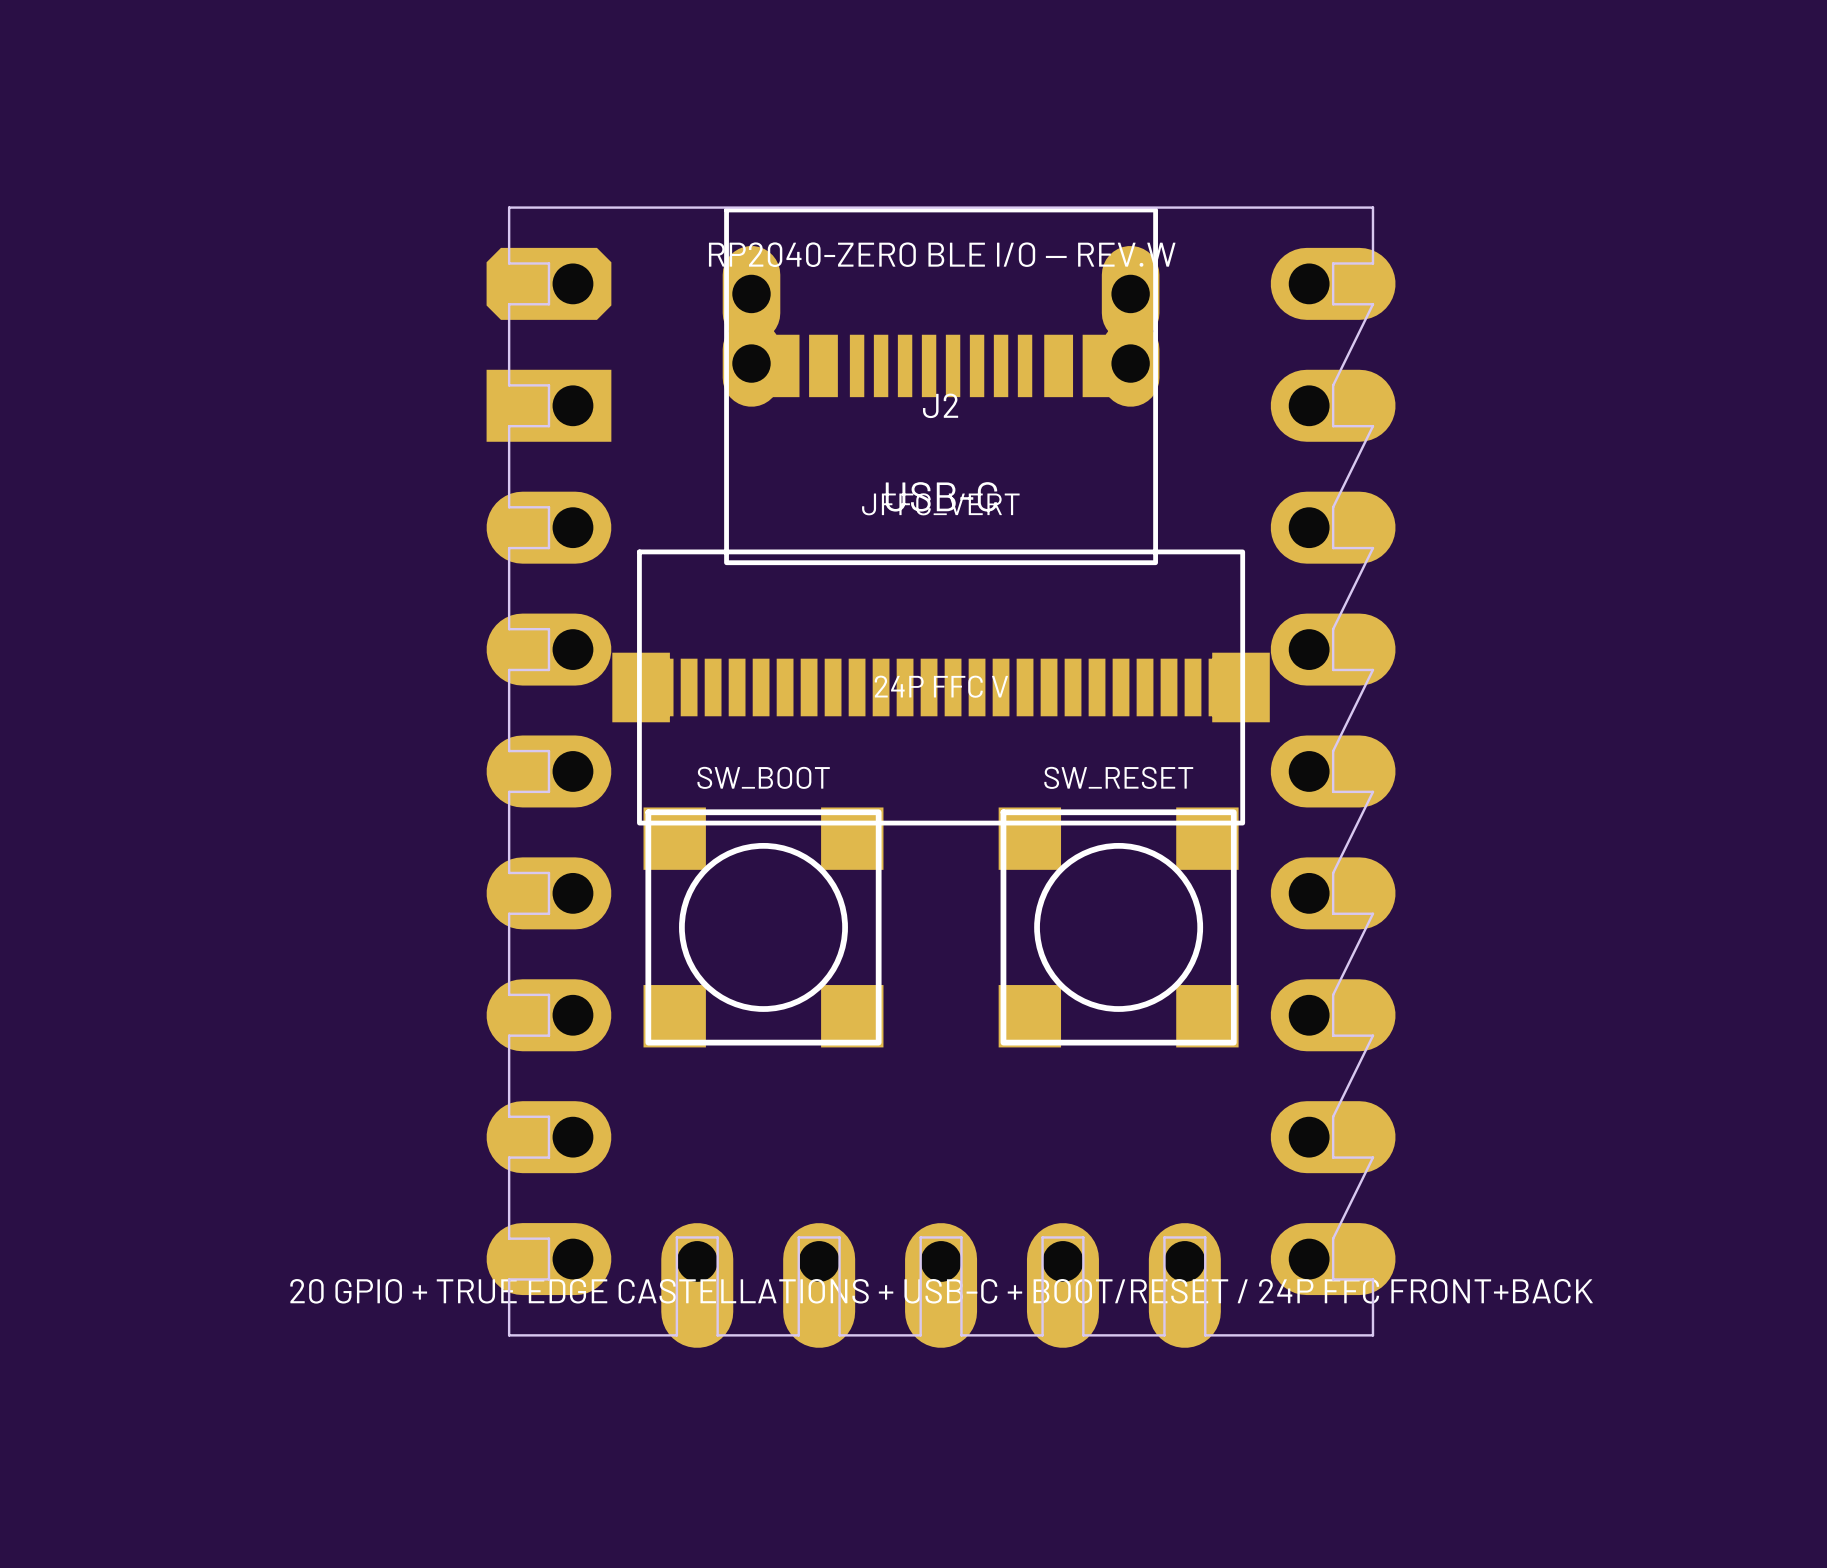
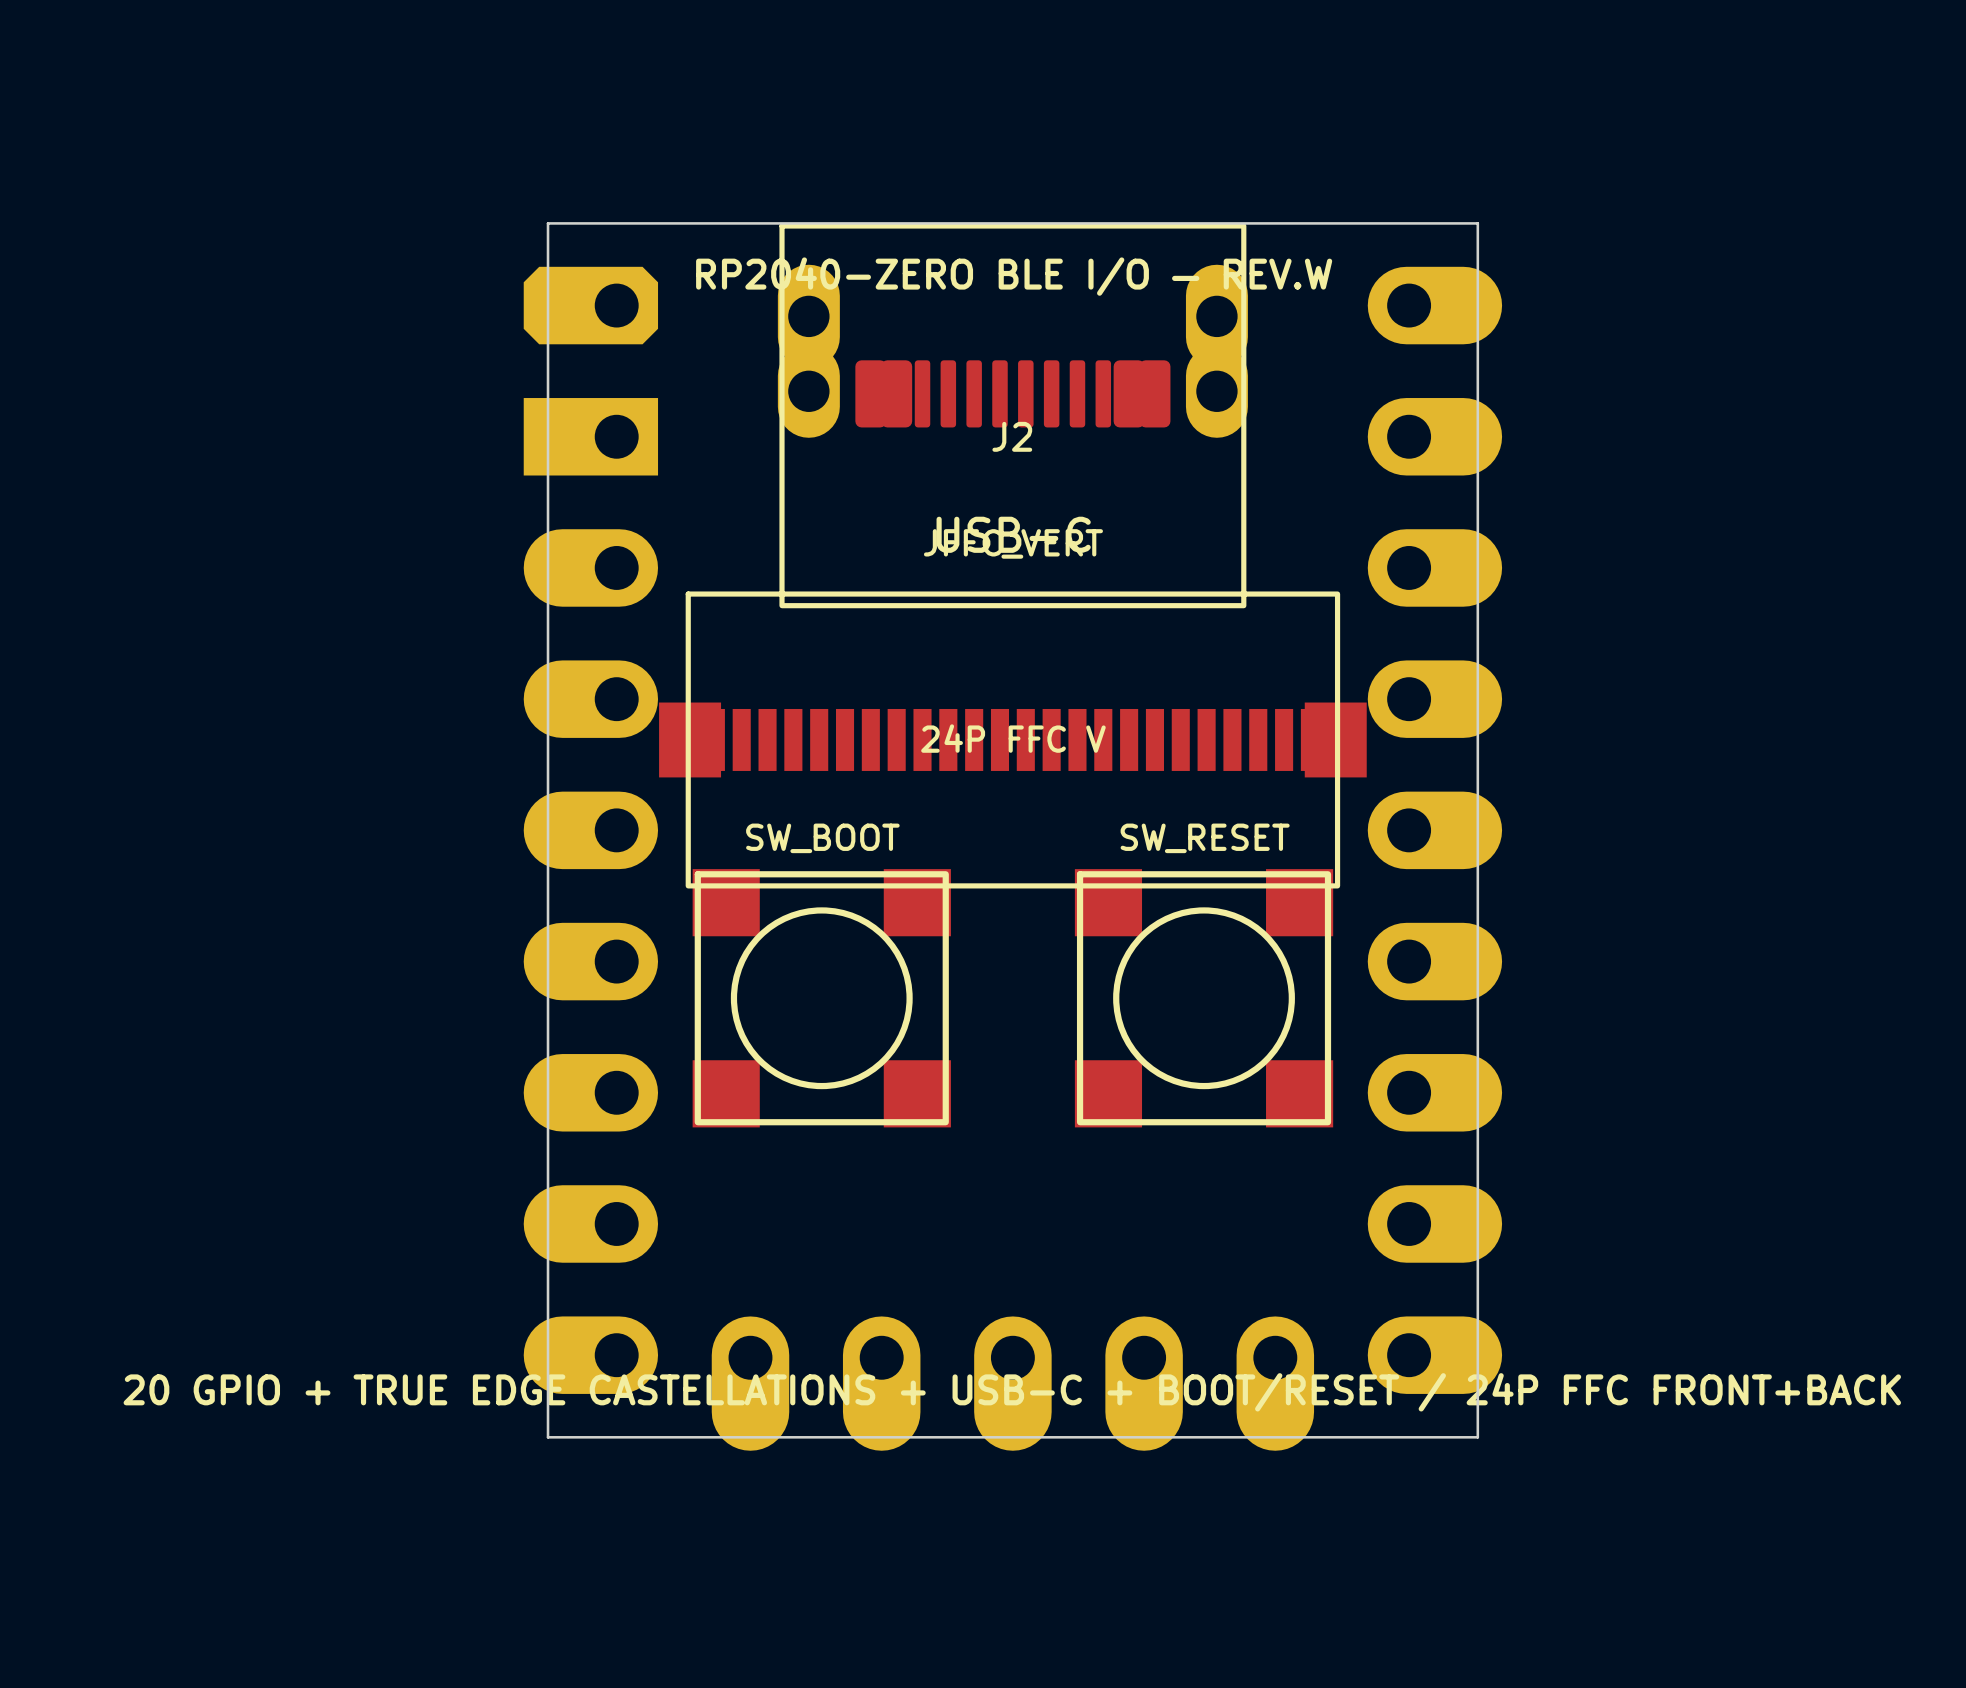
J2 footprint: [722, 207, 1160, 566] -> [777, 223, 1248, 609]
board edge: (509, 263) (548, 263) (548, 304) (509, 304) -> (548, 283) (548, 327)
board edge: (1372, 263) (1333, 263) (1333, 304) (1372, 304) (1333, 385) (1333, 426) (1372, 426) (1333, 507) (1333, 548) (1372, 548) (1333, 629) (1333, 669) (1372, 669) (1333, 751) (1333, 791) (1372, 791) (1333, 872) (1333, 913) (1372, 913) (1333, 994) (1333, 1035) (1372, 1035) (1333, 1116) (1333, 1157) (1372, 1157) (1333, 1238) (1333, 1279) (1372, 1279) -> (1477, 283) (1477, 1377)
board edge: (509, 385) (548, 385) (548, 426) (509, 426) -> (548, 414) (548, 458)
board edge: (509, 507) (548, 507) (548, 548) (509, 548) -> (548, 546) (548, 589)
board edge: (509, 629) (548, 629) (548, 669) (509, 669) -> (548, 677) (548, 721)
board edge: (509, 751) (548, 751) (548, 791) (509, 791) -> (548, 808) (548, 852)
board edge: (509, 872) (548, 872) (548, 913) (509, 913) -> (548, 939) (548, 983)
board edge: (509, 994) (548, 994) (548, 1035) (509, 1035) -> (548, 1070) (548, 1114)
board edge: (509, 1116) (548, 1116) (548, 1157) (509, 1157) -> (548, 1202) (548, 1245)
board edge: (509, 1238) (548, 1238) (548, 1279) (509, 1279) -> (548, 1333) (548, 1377)
board edge: (676, 1335) (676, 1237) (717, 1237) (717, 1335) -> (728, 1437) (772, 1437)
board edge: (798, 1335) (798, 1237) (839, 1237) (839, 1335) -> (859, 1437) (903, 1437)
board edge: (920, 1335) (920, 1237) (961, 1237) (961, 1335) -> (990, 1437) (1034, 1437)
board edge: (1042, 1335) (1042, 1237) (1083, 1237) (1083, 1335) -> (1122, 1437) (1166, 1437)
board edge: (1164, 1335) (1164, 1237) (1205, 1237) (1205, 1335) -> (1253, 1437) (1297, 1437)

